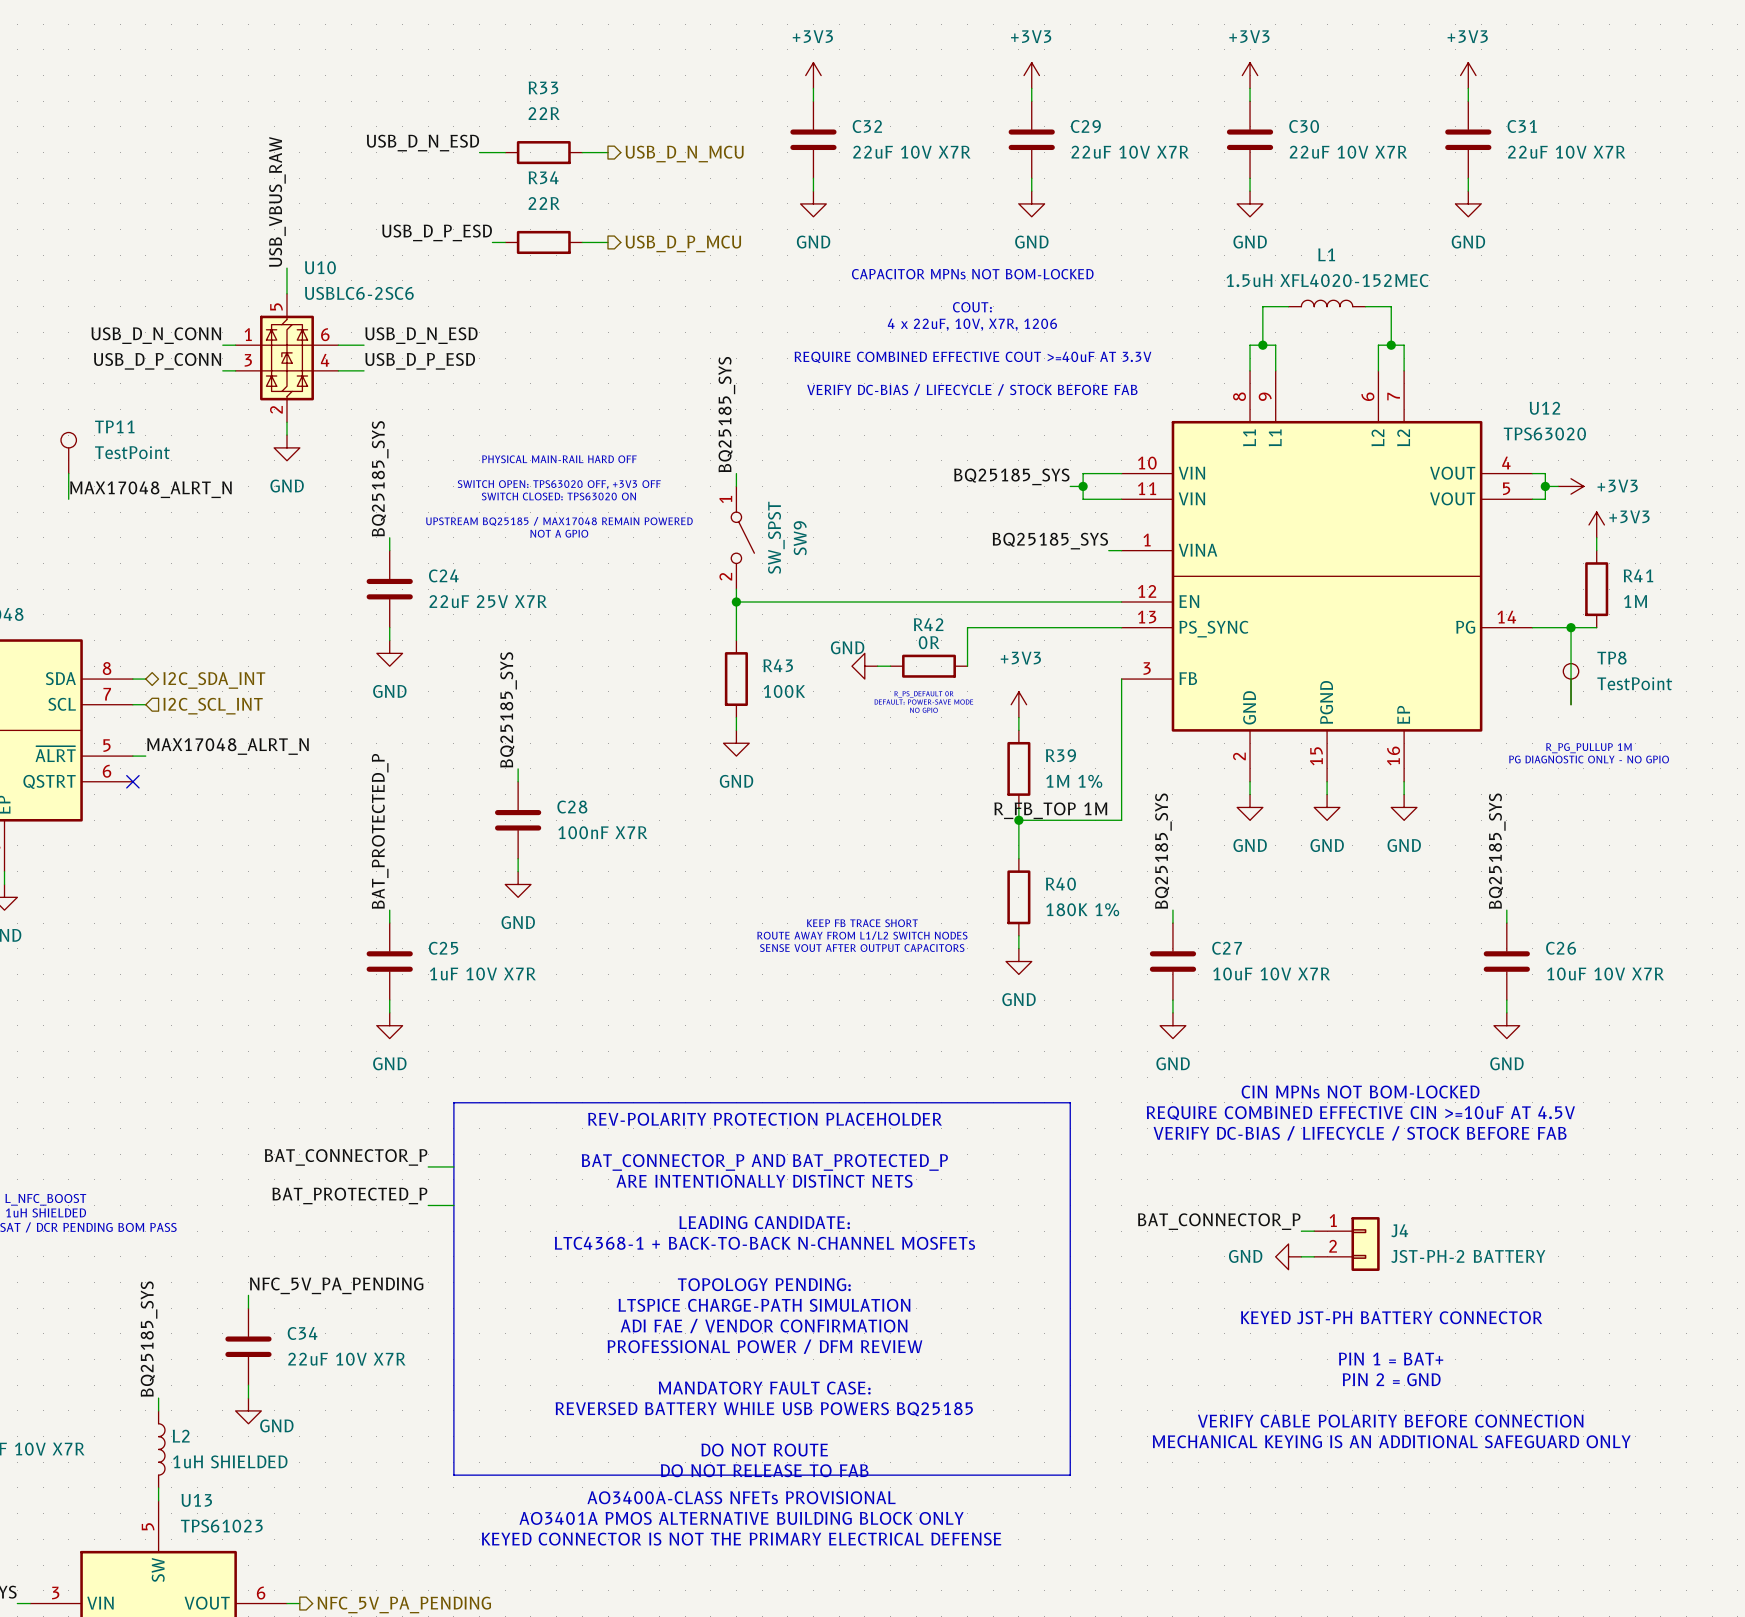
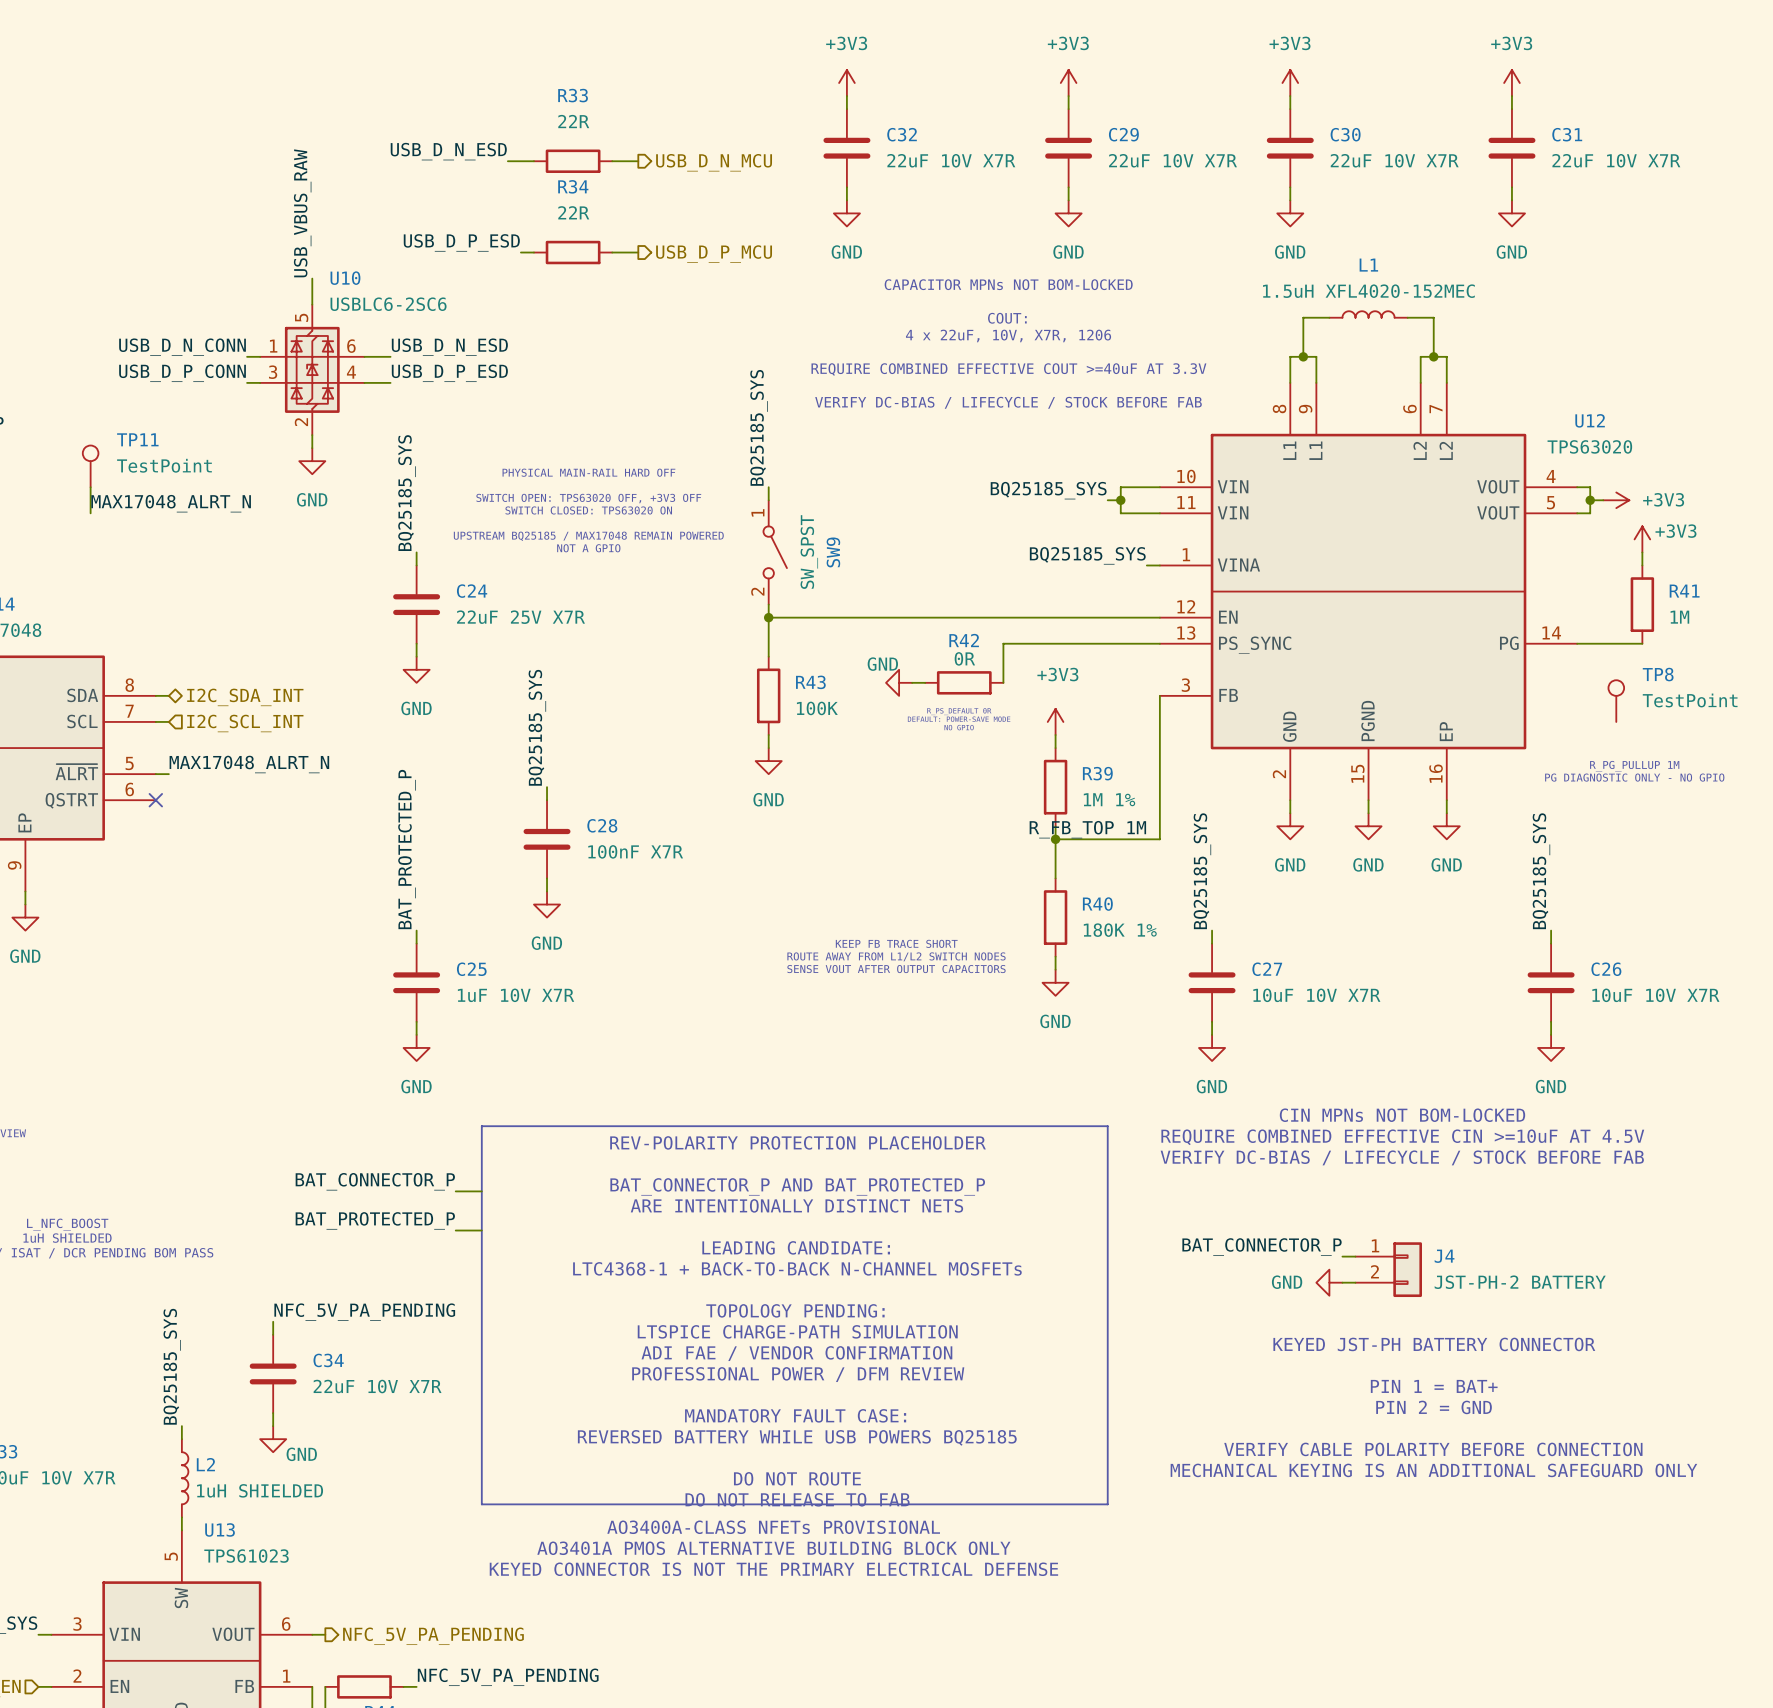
wire: (1571, 627) (1571, 704) -> none
junction: (1571, 627) -> none

